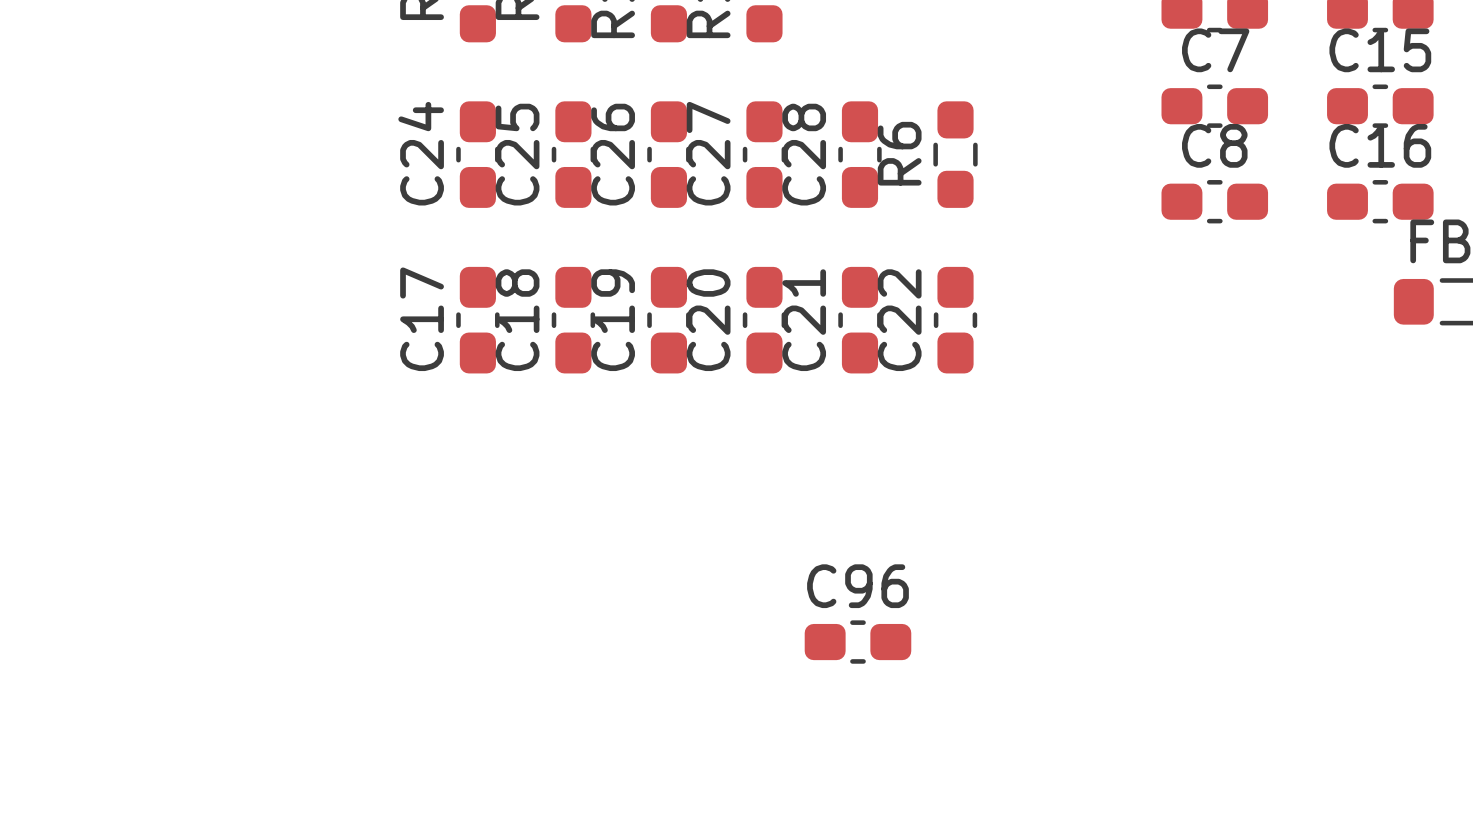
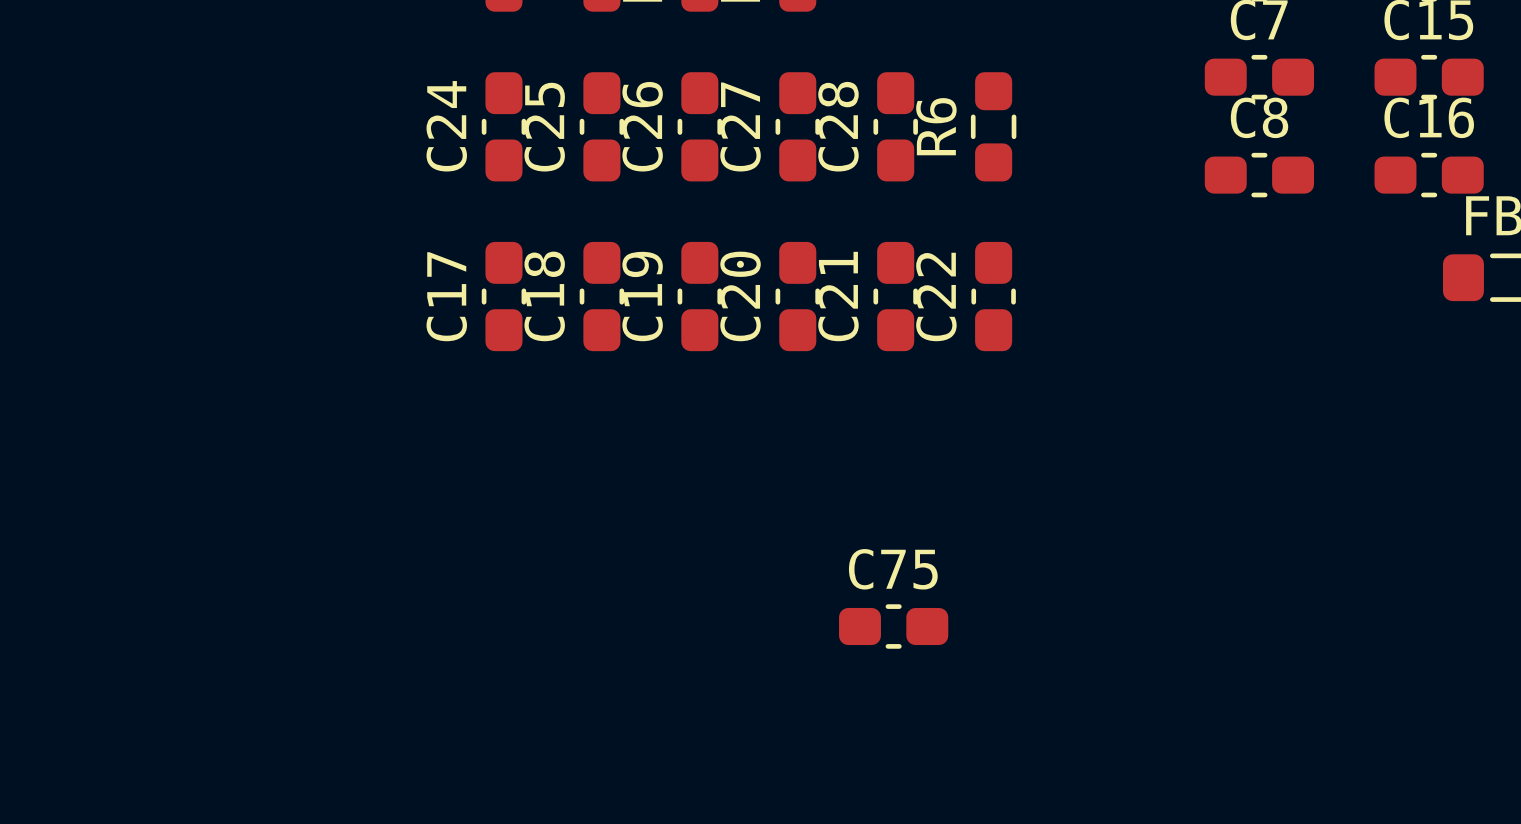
C96 name: C96 (857, 586) -> C75 (893, 569)

